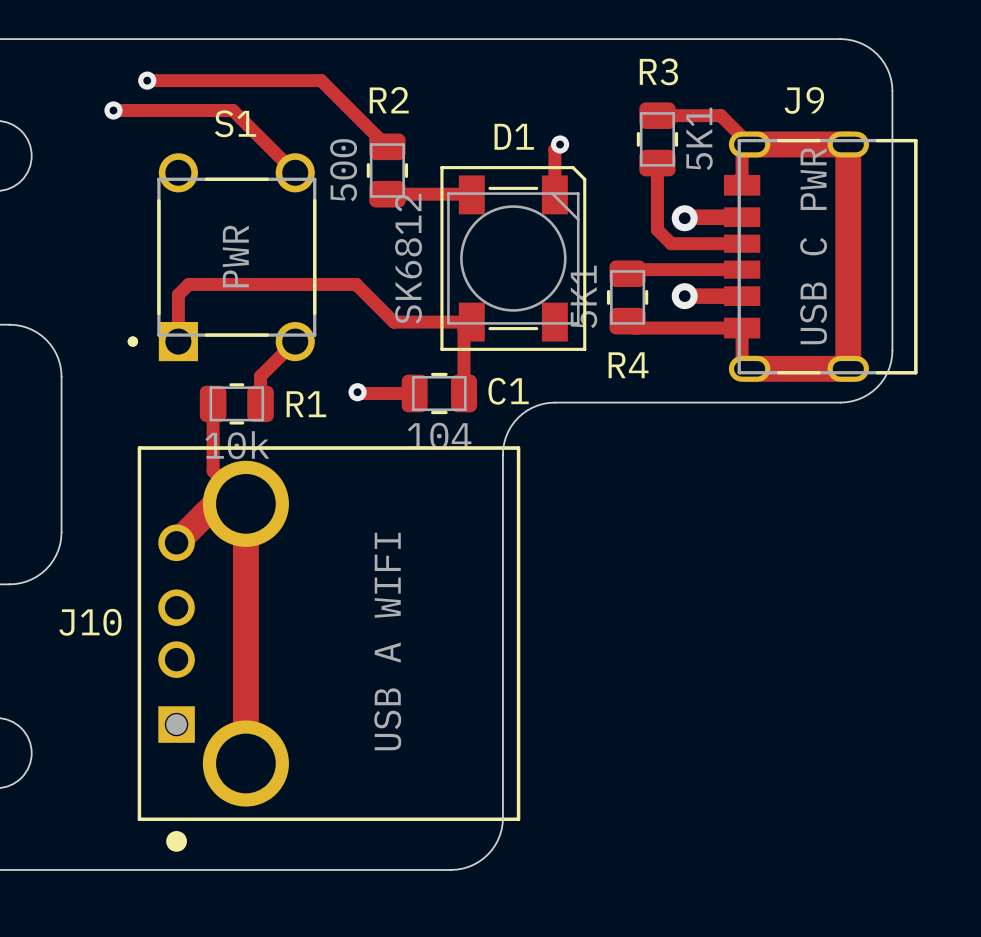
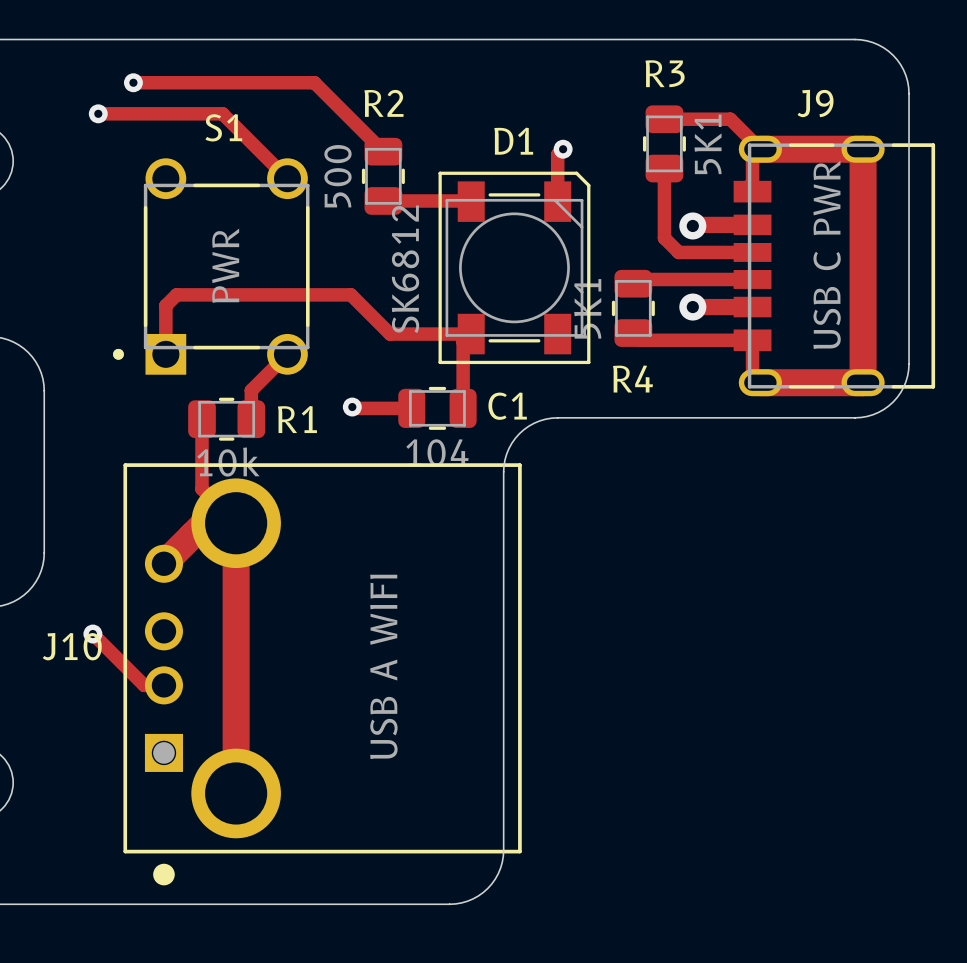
track: none -> (92, 634) (144, 685) (163, 685)
via: none -> (92, 634)

